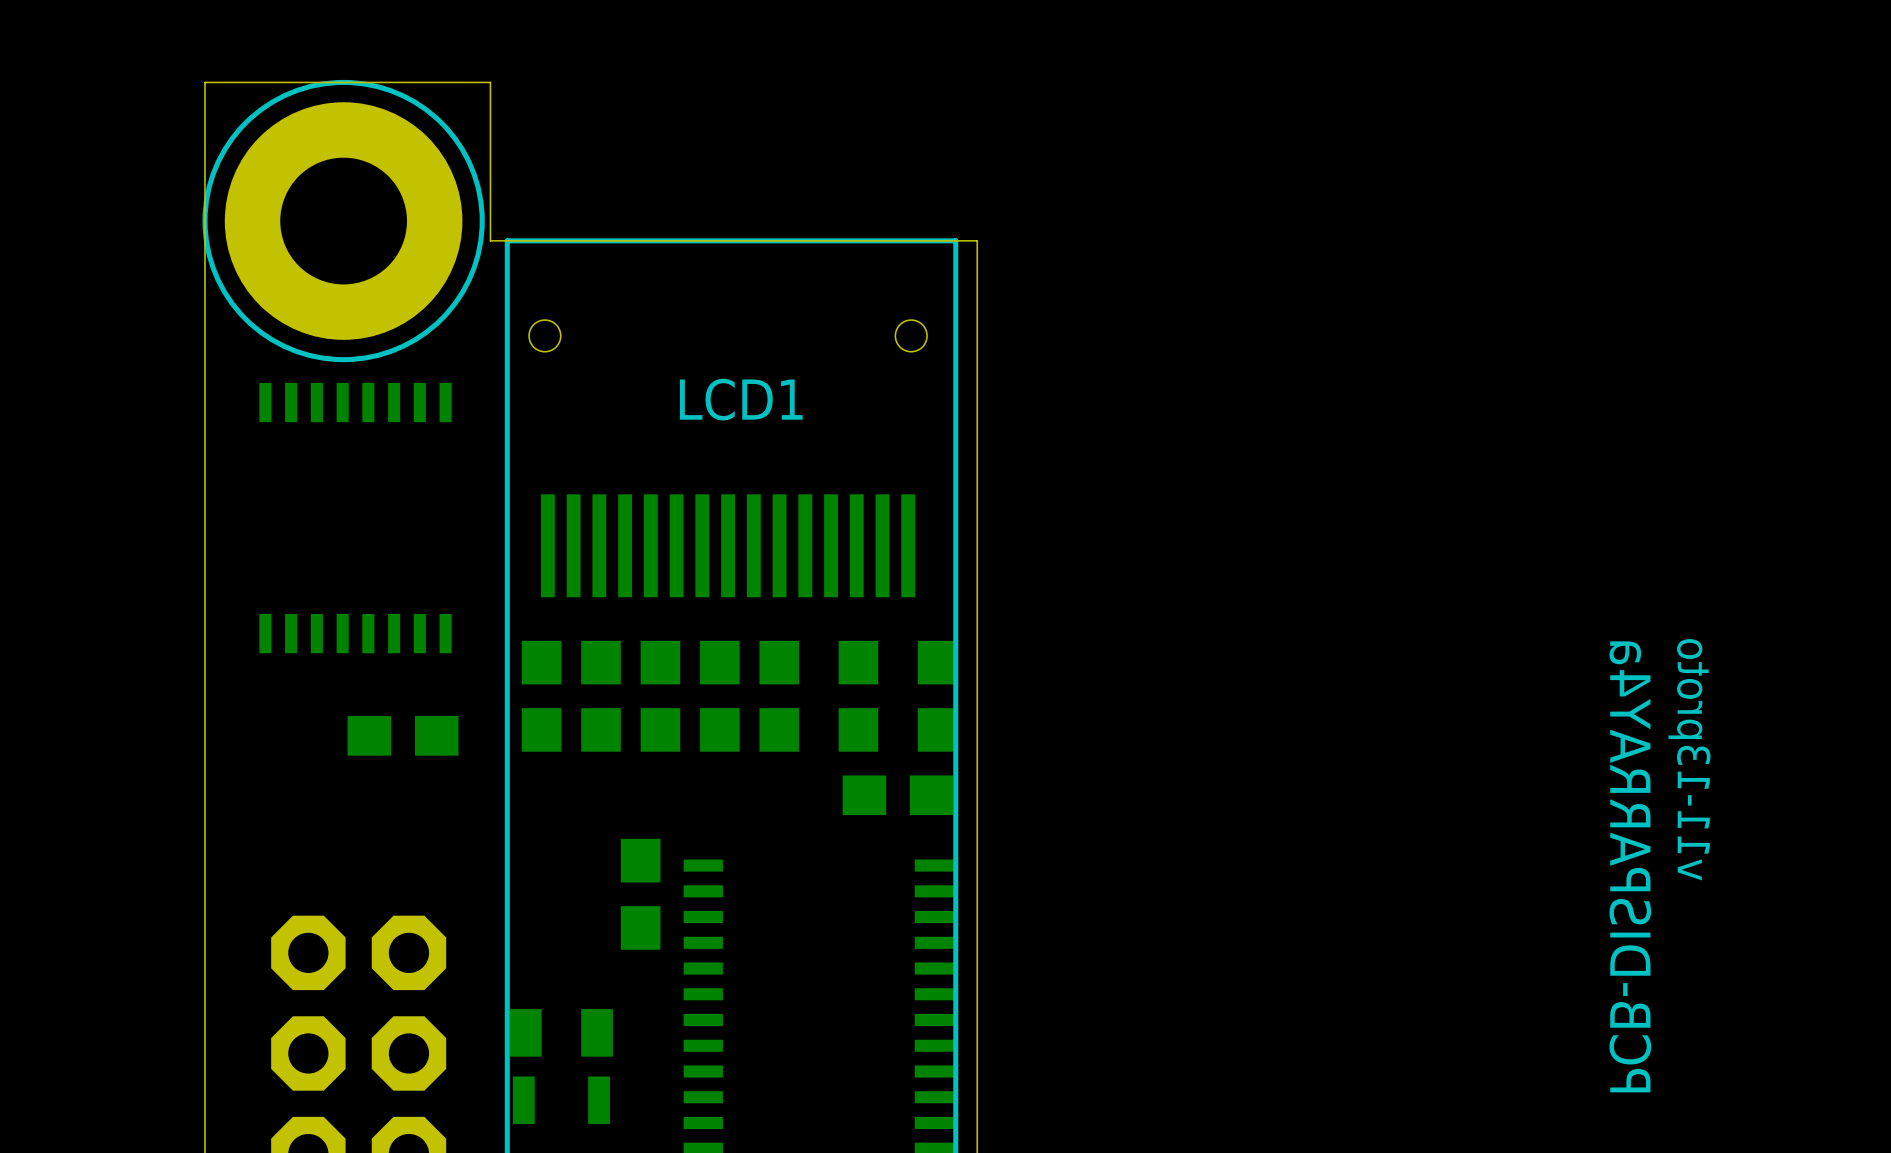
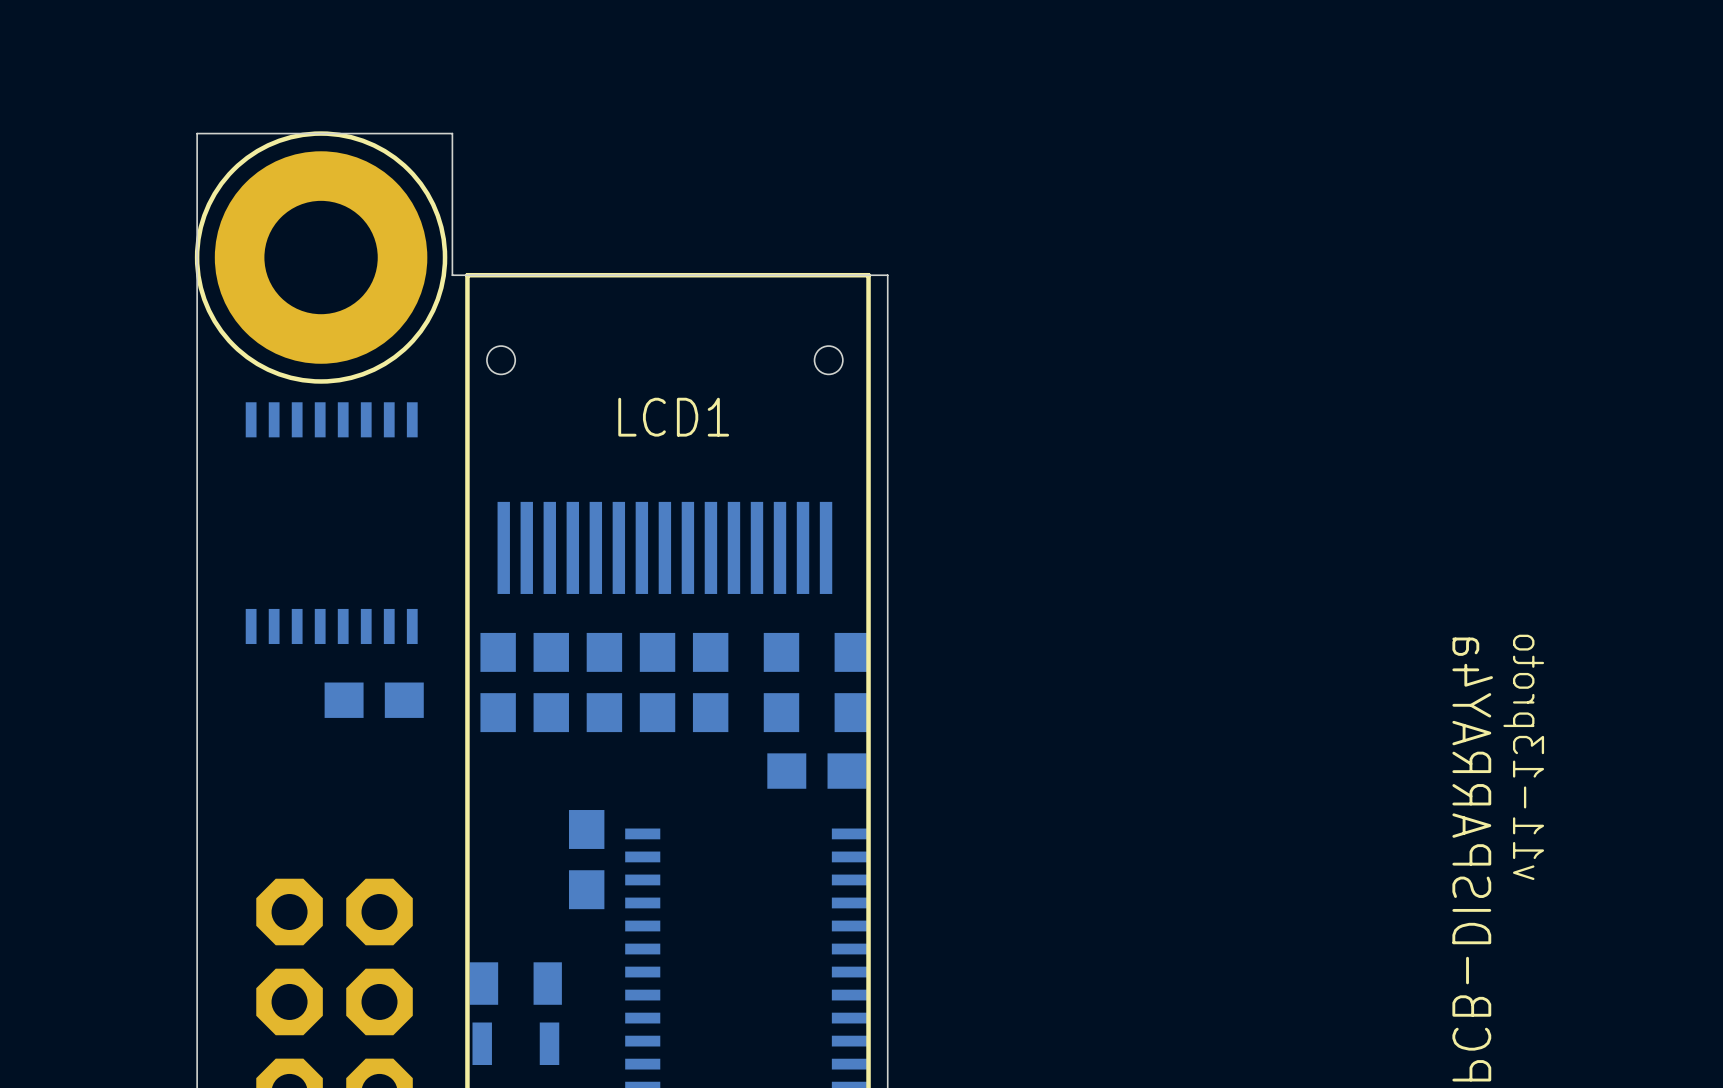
part position: (403, 735) -> (374, 700)

